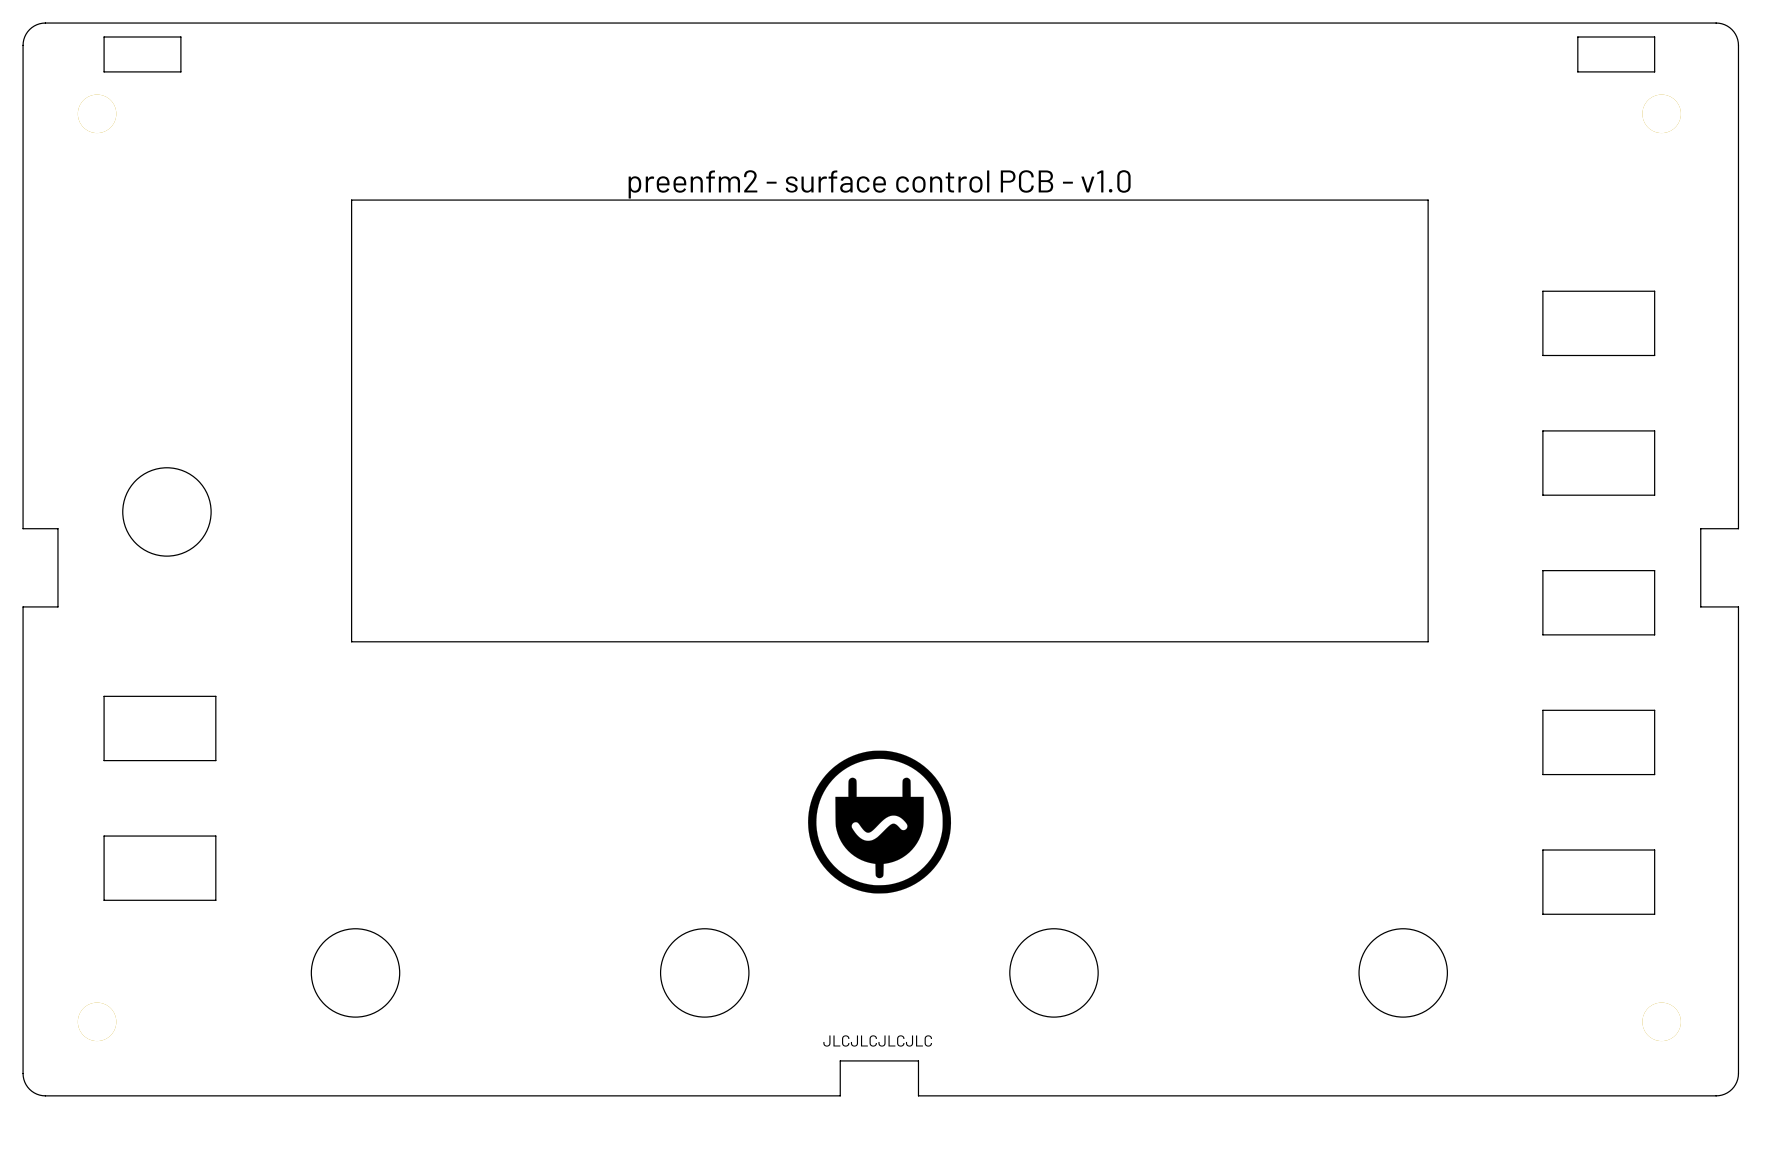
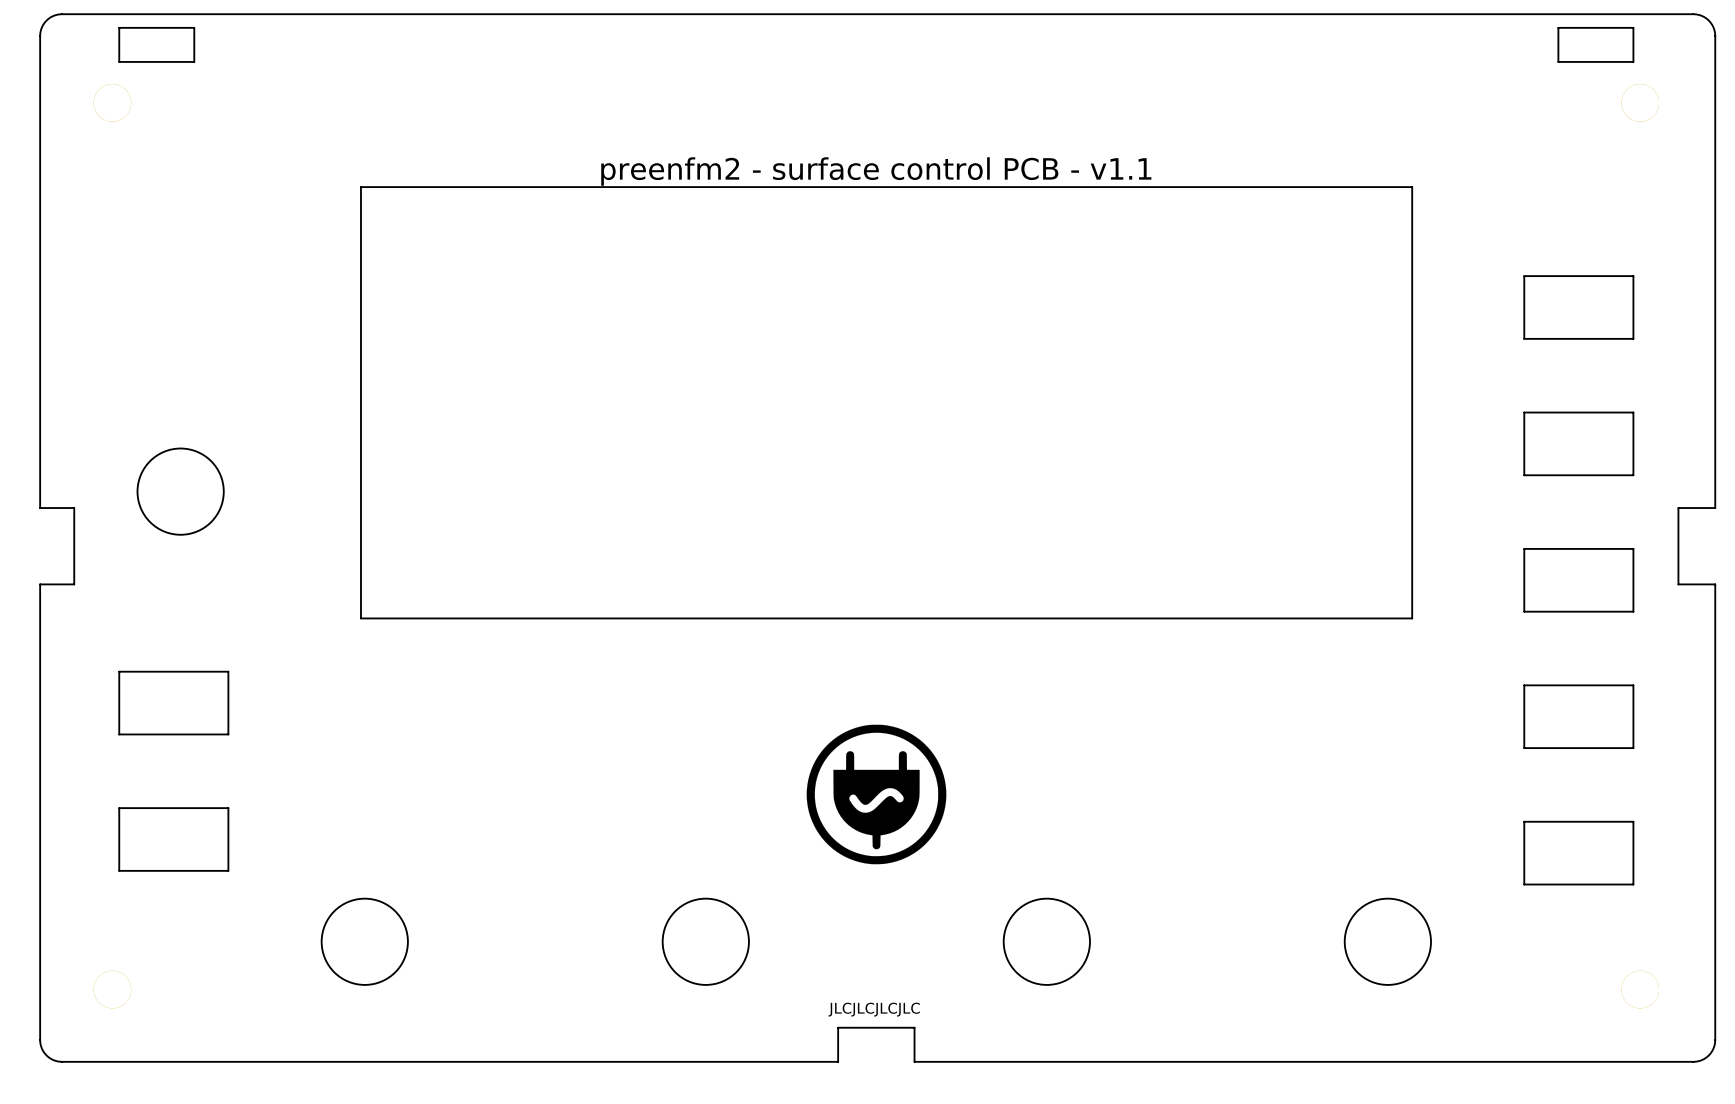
text: preenfm2 - surface control PCB - v1.0 (879, 184) -> preenfm2 - surface control PCB - v1.1 (876, 171)

